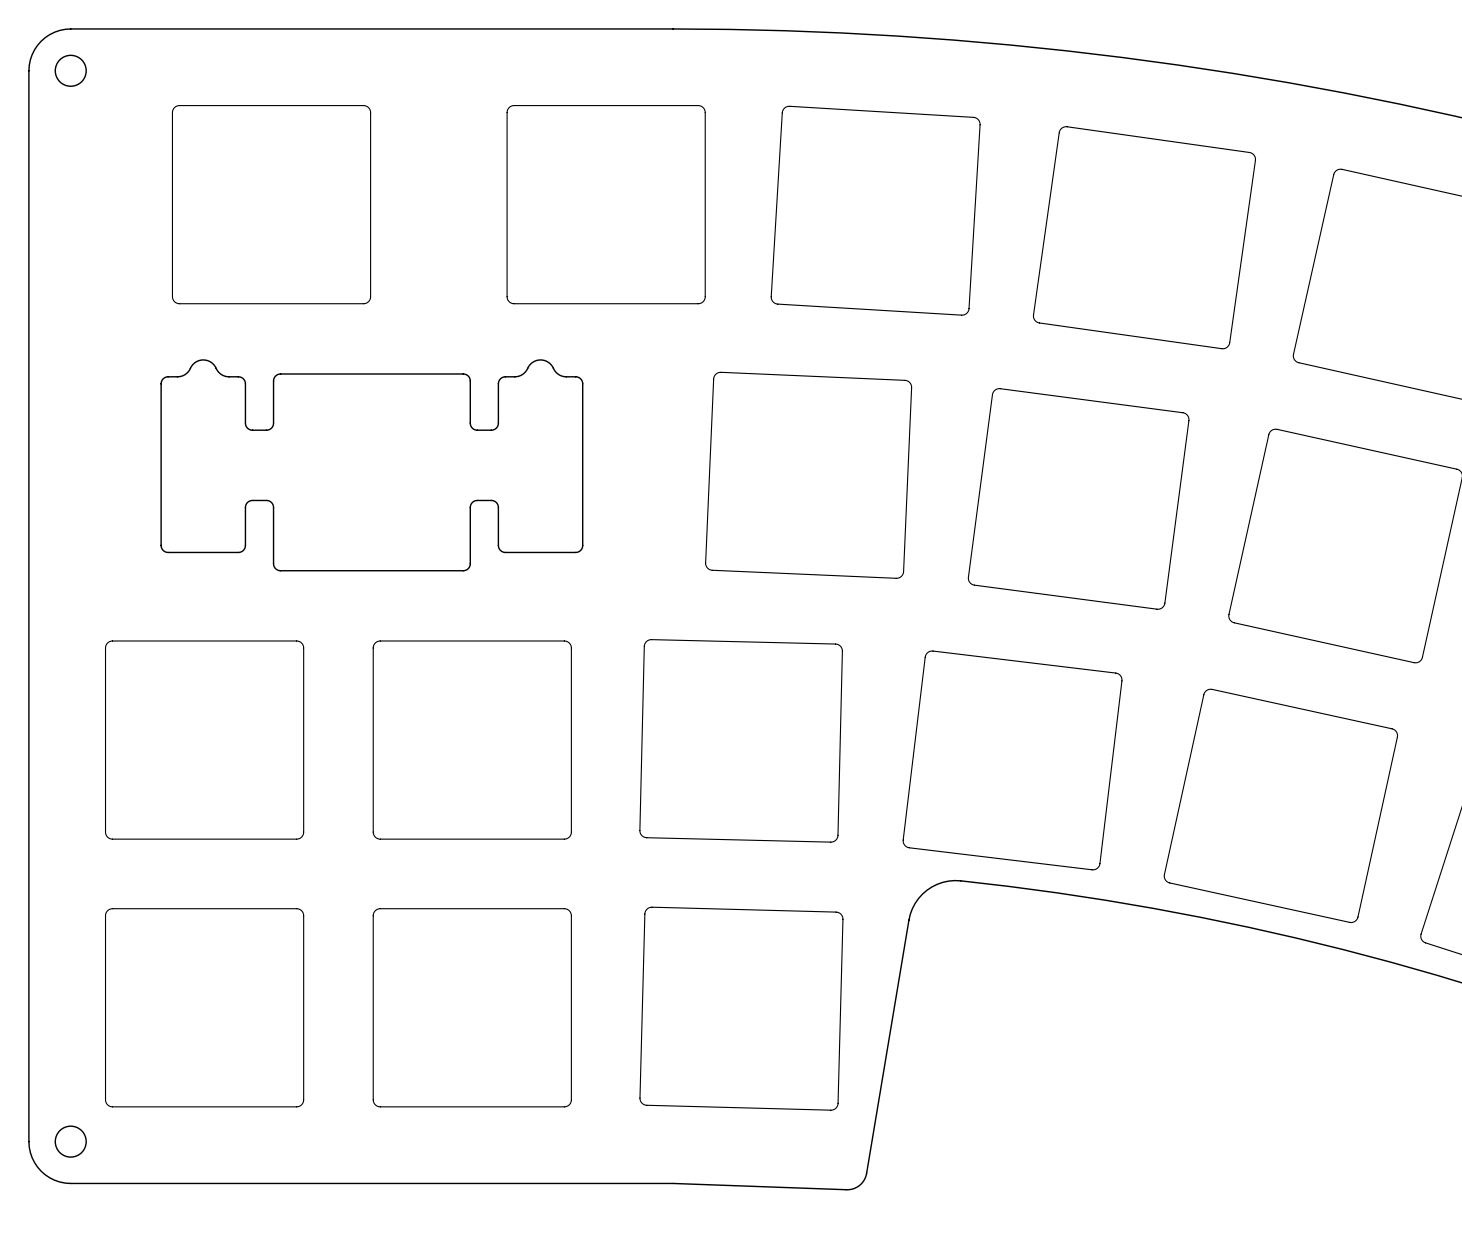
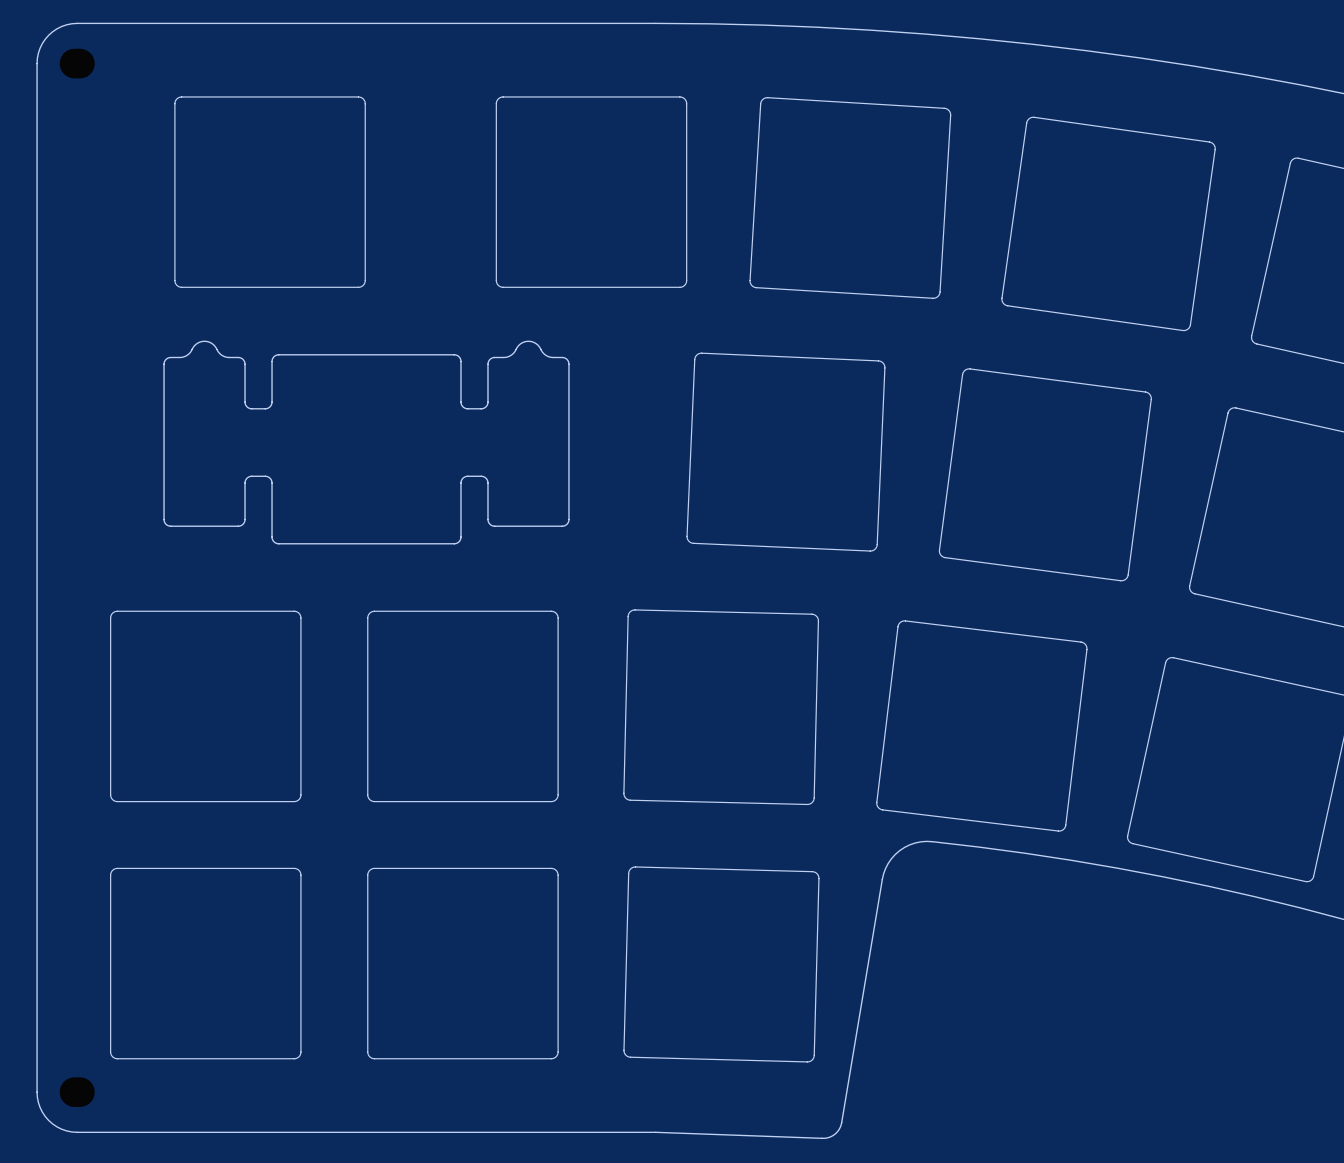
round board edge: [54, 54, 87, 87] -> none
part: none -> (77, 63)
round board edge: [54, 1125, 87, 1158] -> none
part: none -> (77, 1092)

